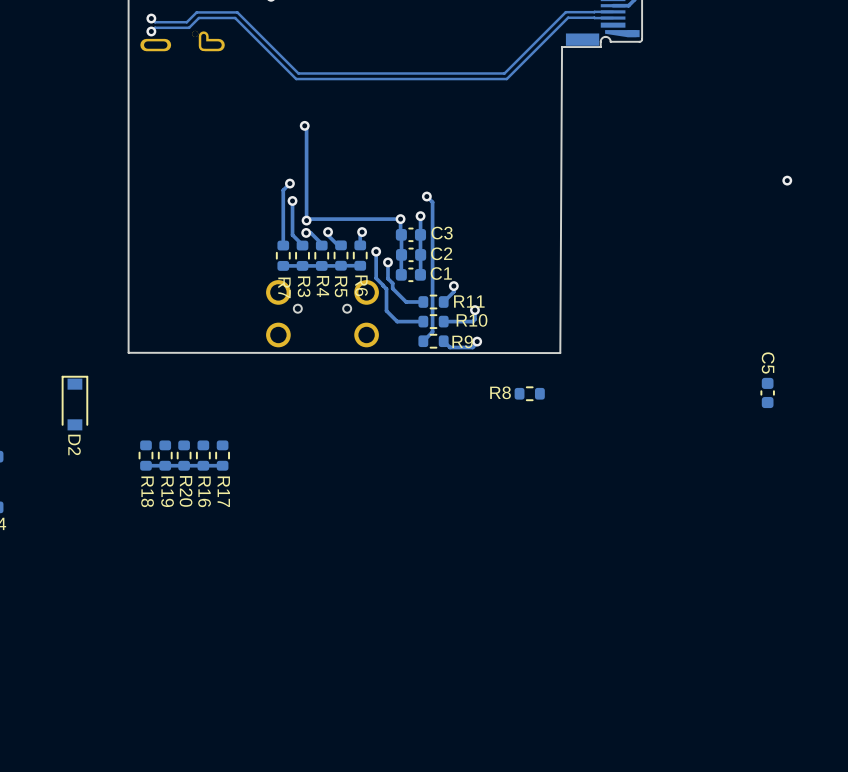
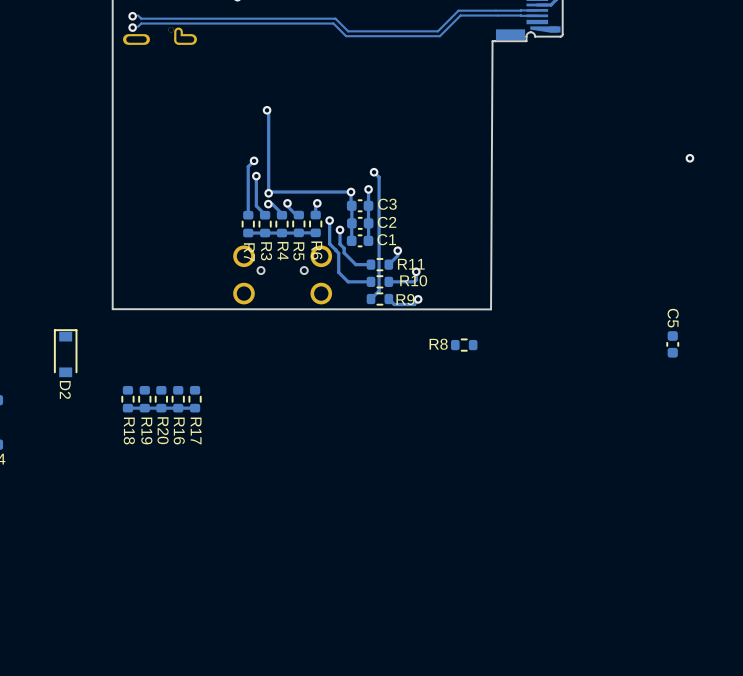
track: (565, 12) (504, 73) (298, 73) (237, 12) (196, 12) (186, 22) (155, 22) (151, 18) -> (495, 10) (458, 10) (437, 31) (348, 31) (335, 18) (141, 18) (137, 15)
track: (568, 17) (506, 79) (296, 79) (235, 17) (198, 17) (189, 27) (155, 27) (151, 31) -> (497, 15) (460, 15) (439, 36) (346, 36) (333, 23) (141, 23) (137, 26)

